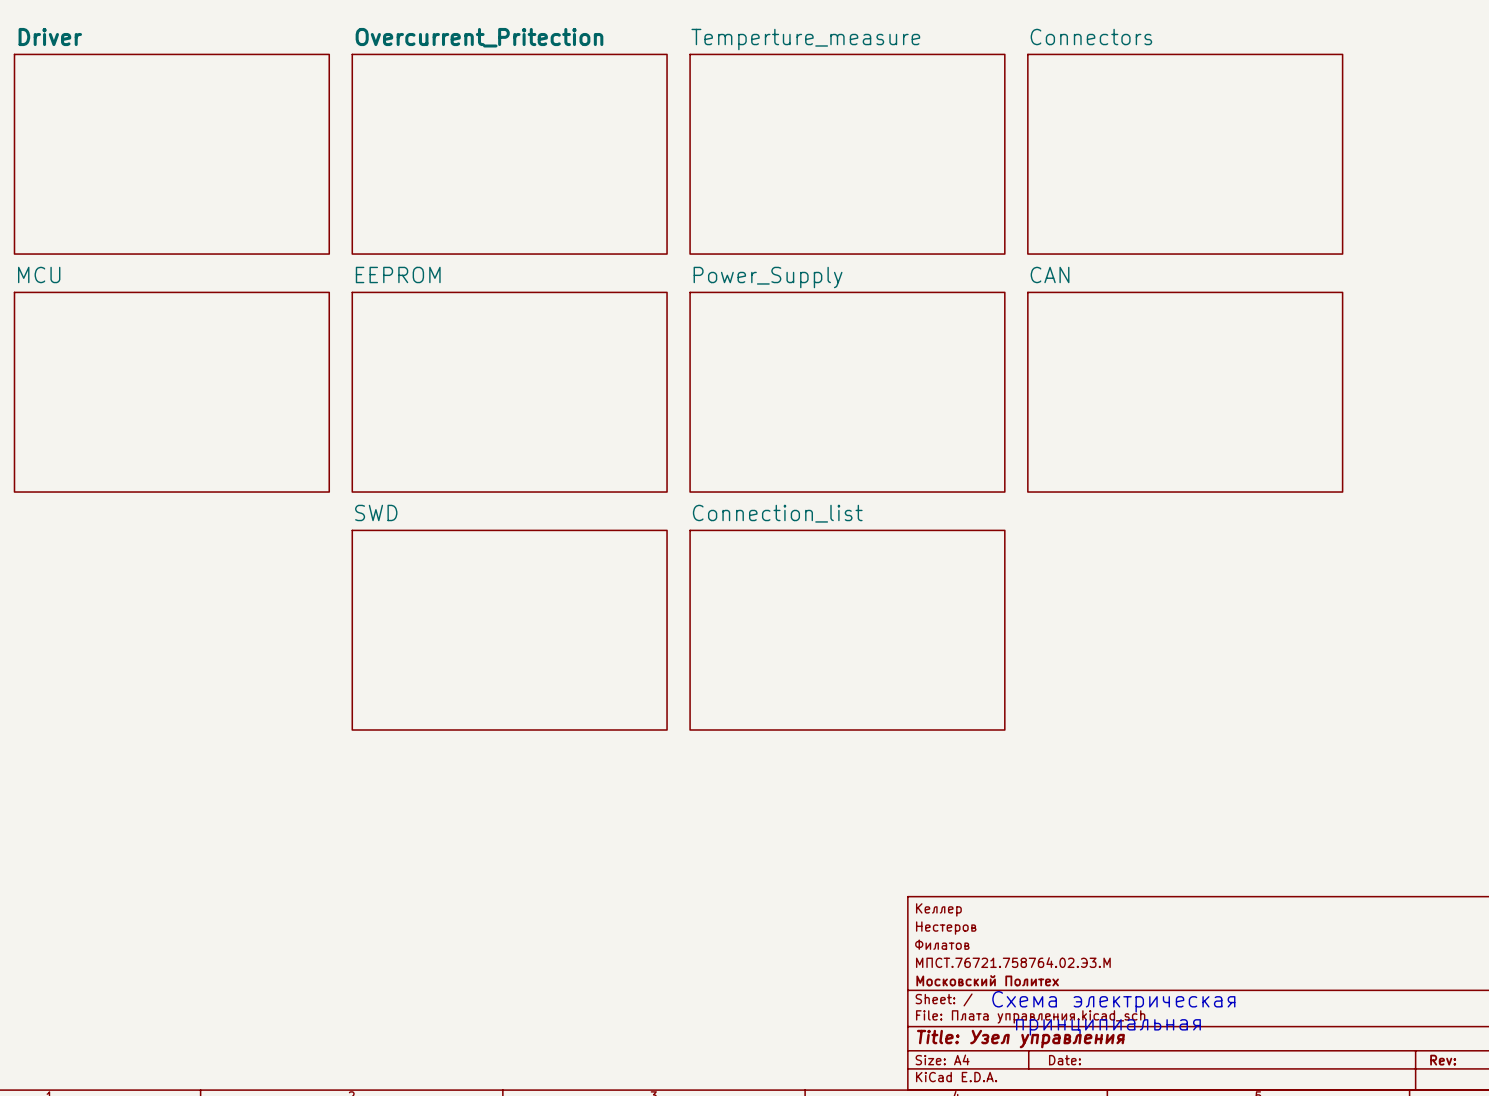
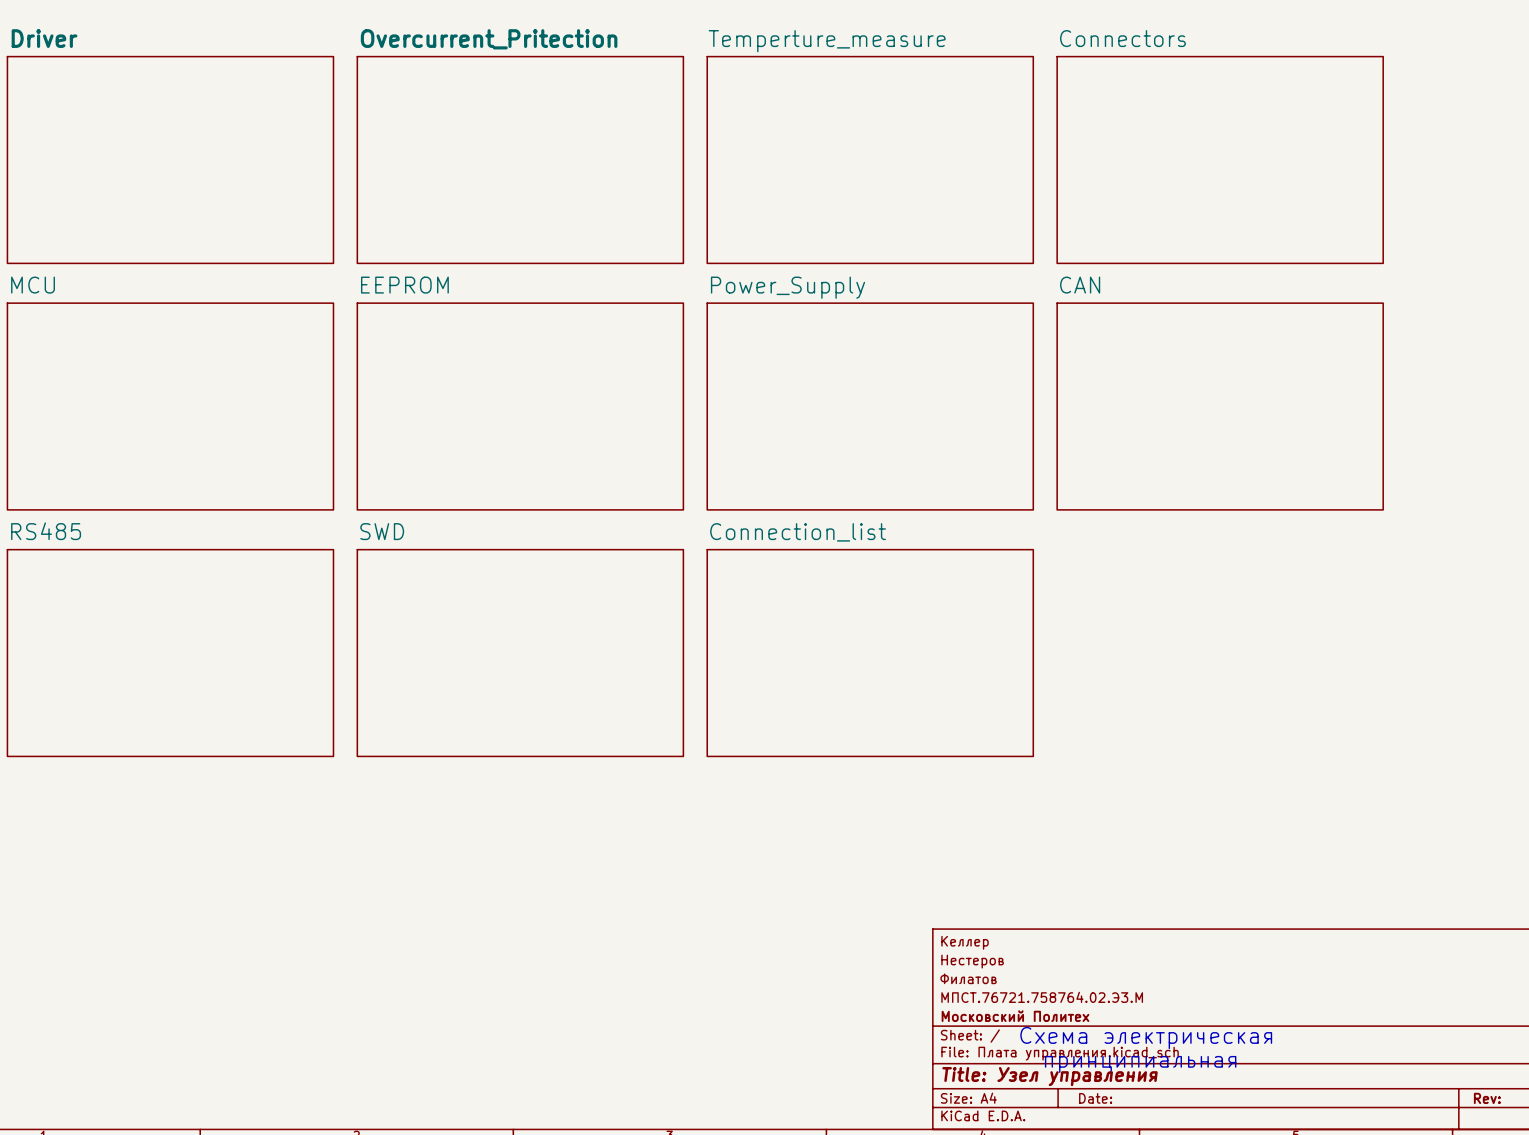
sheet RS485: none -> (170, 653)

